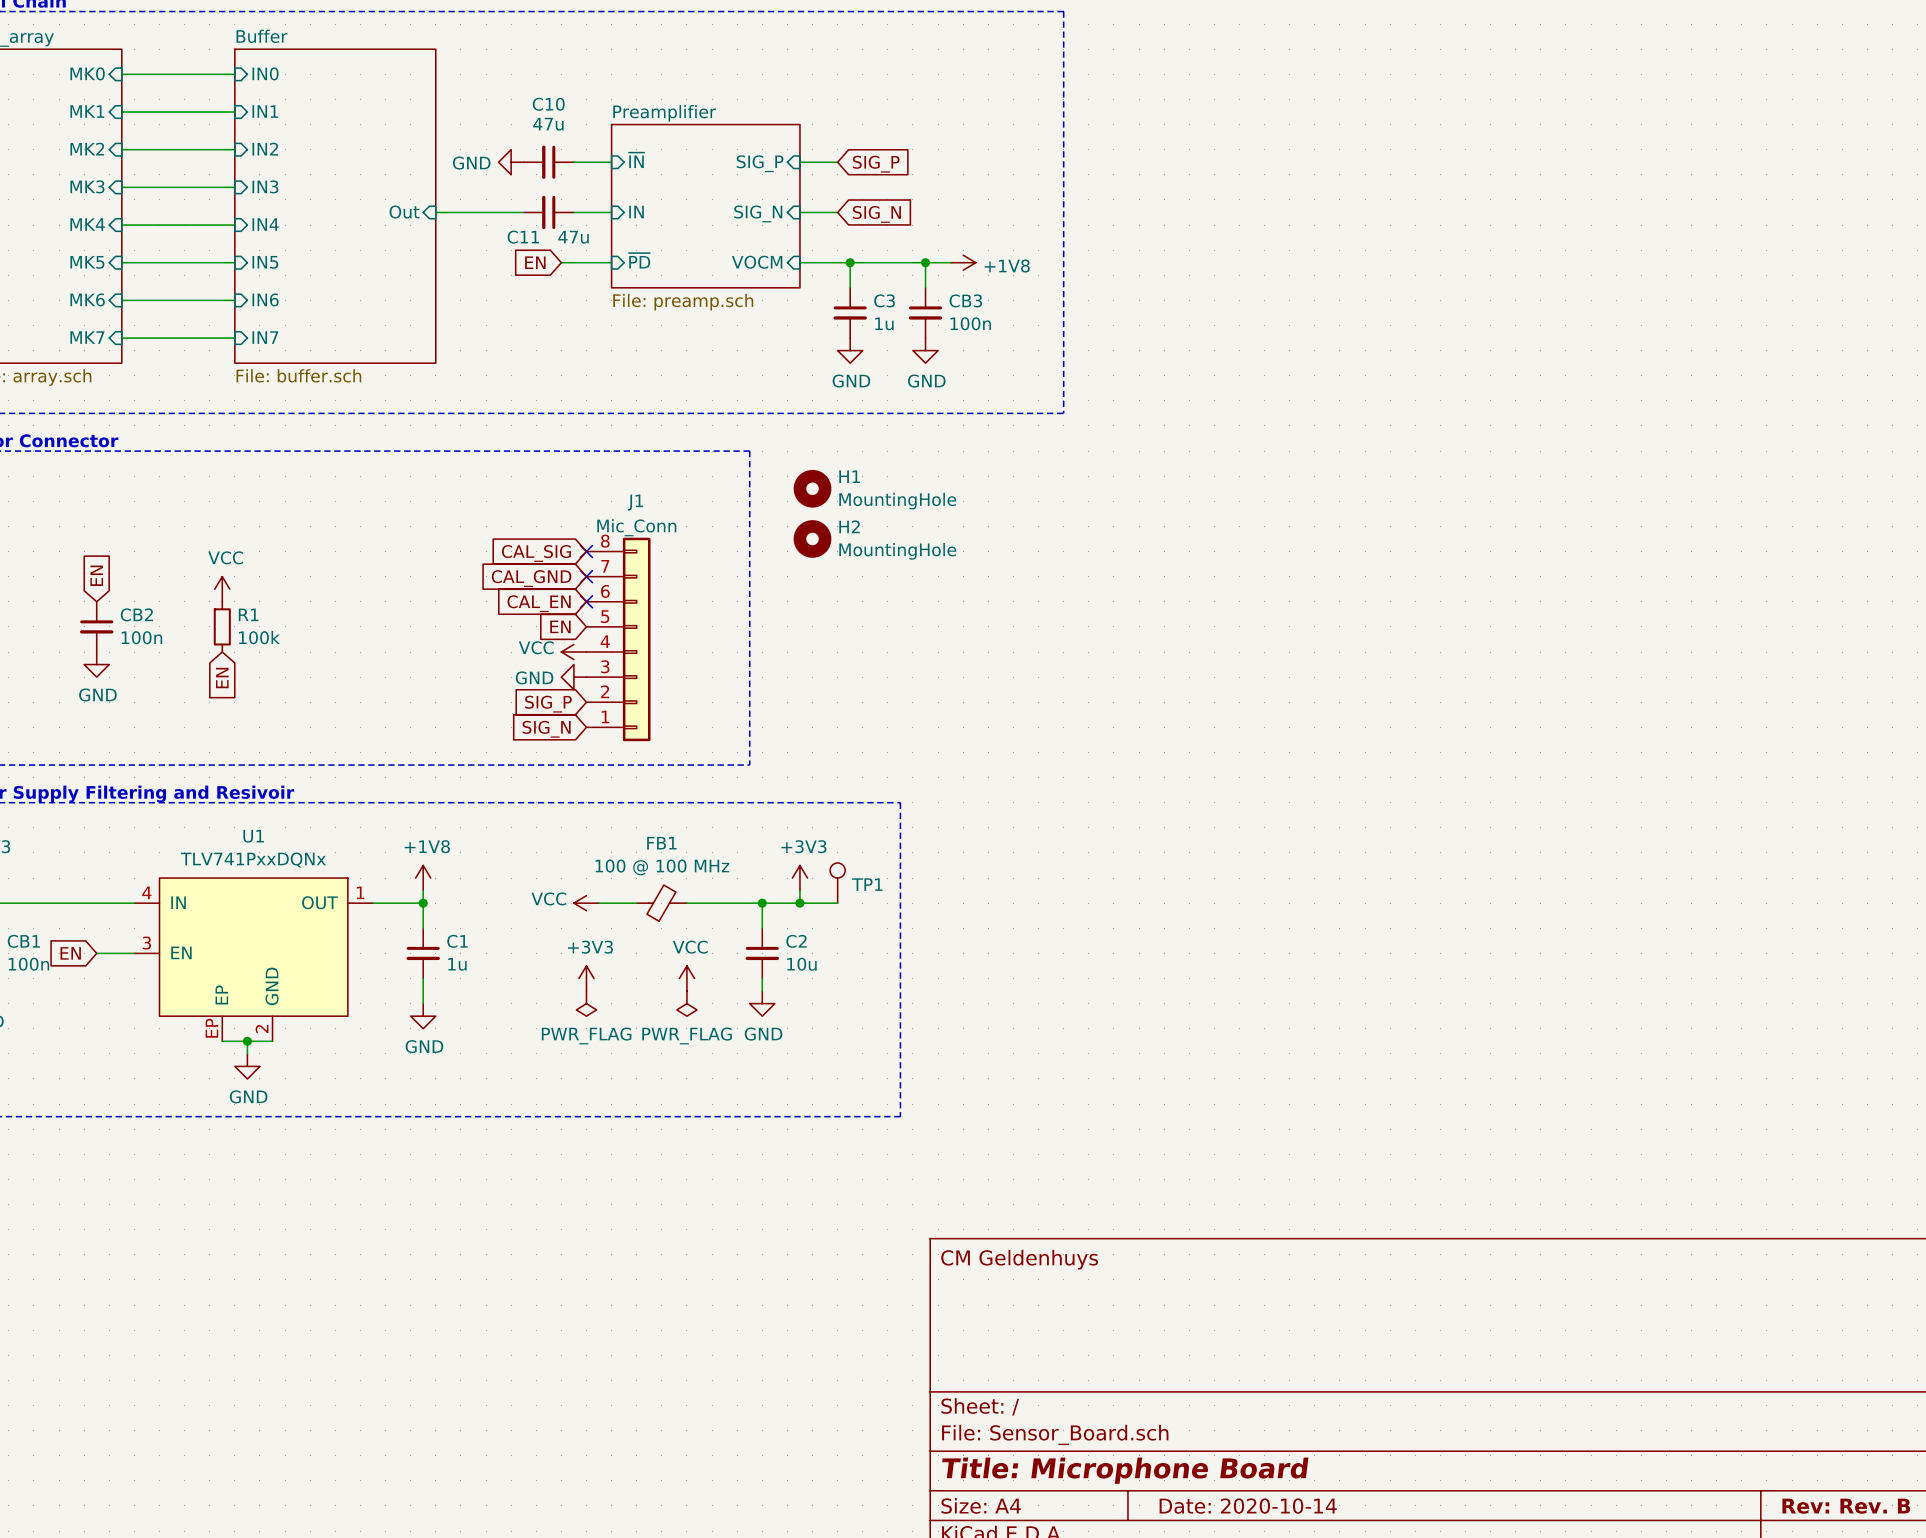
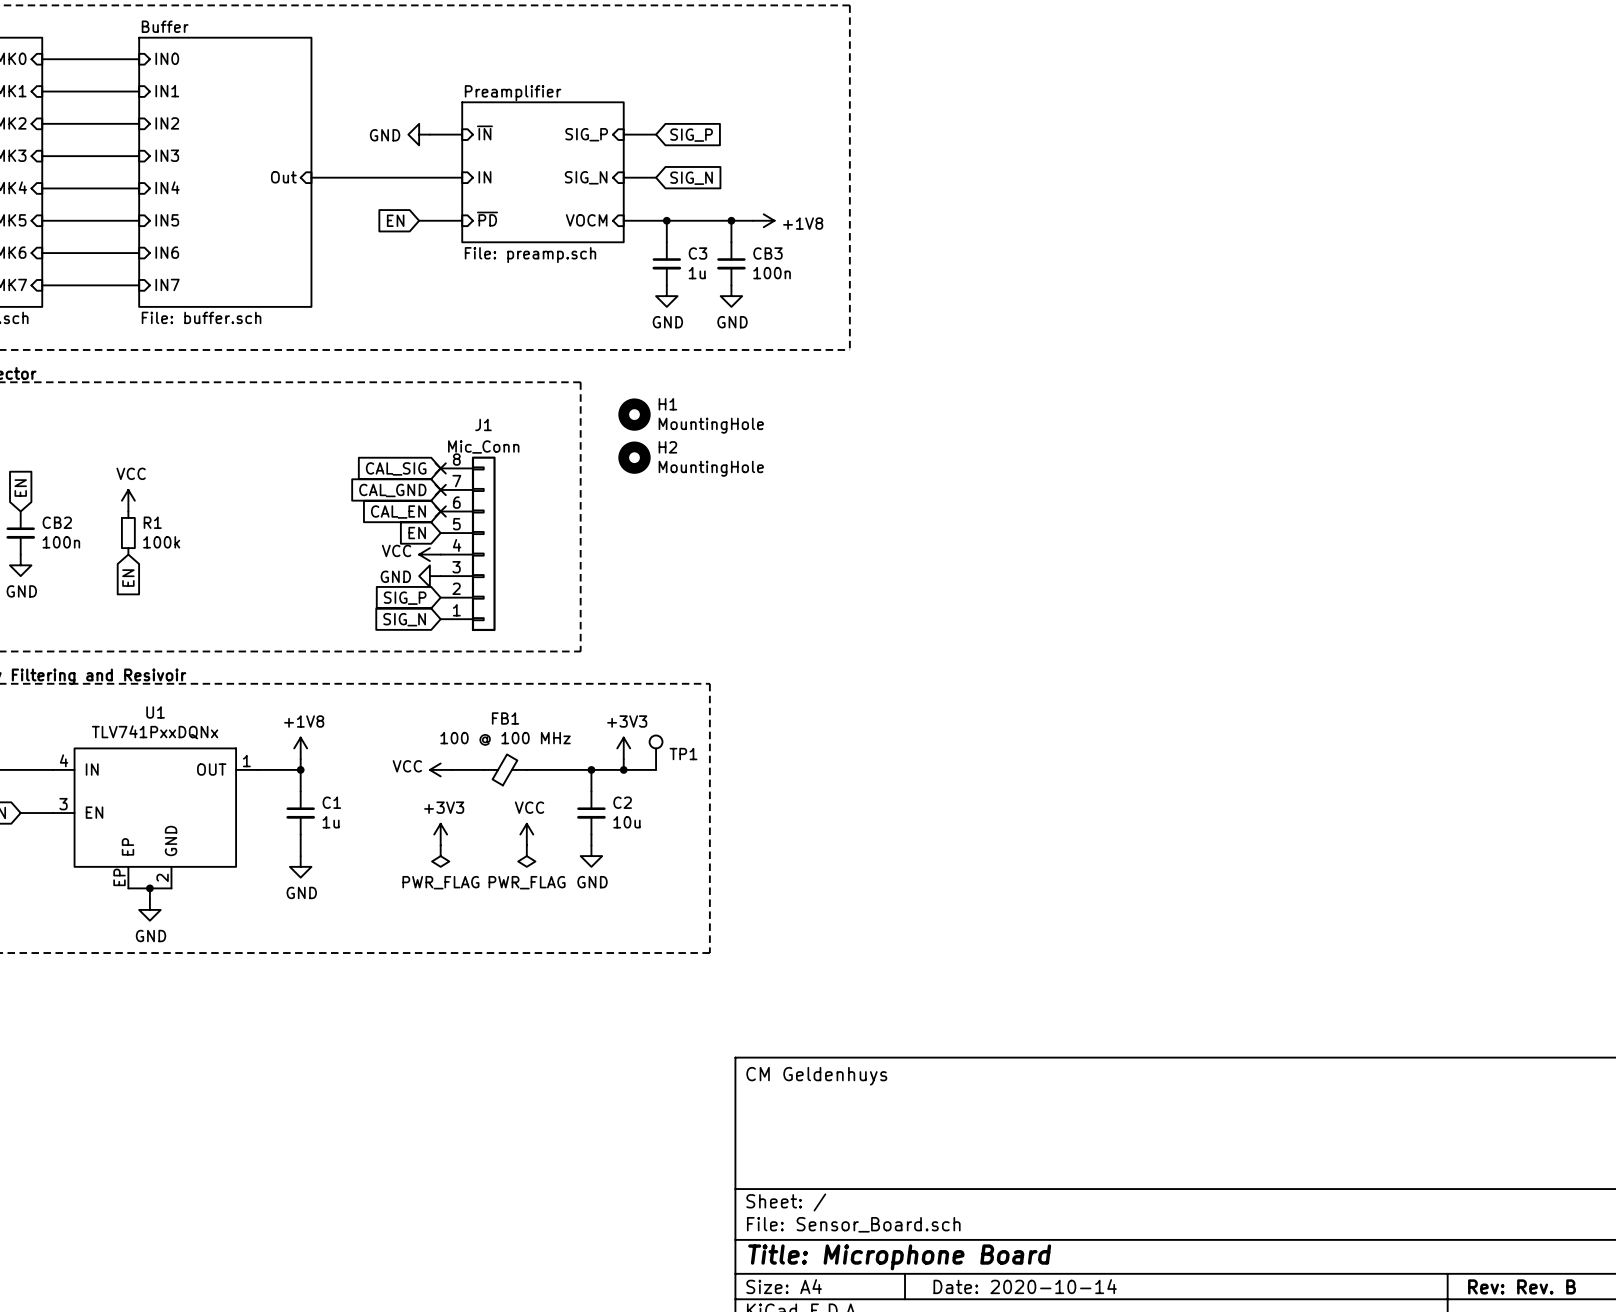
power symbol position: GND (511, 162) -> GND (419, 134)
C10: 47u (548, 162) -> none
C11: 47u (548, 212) -> none

